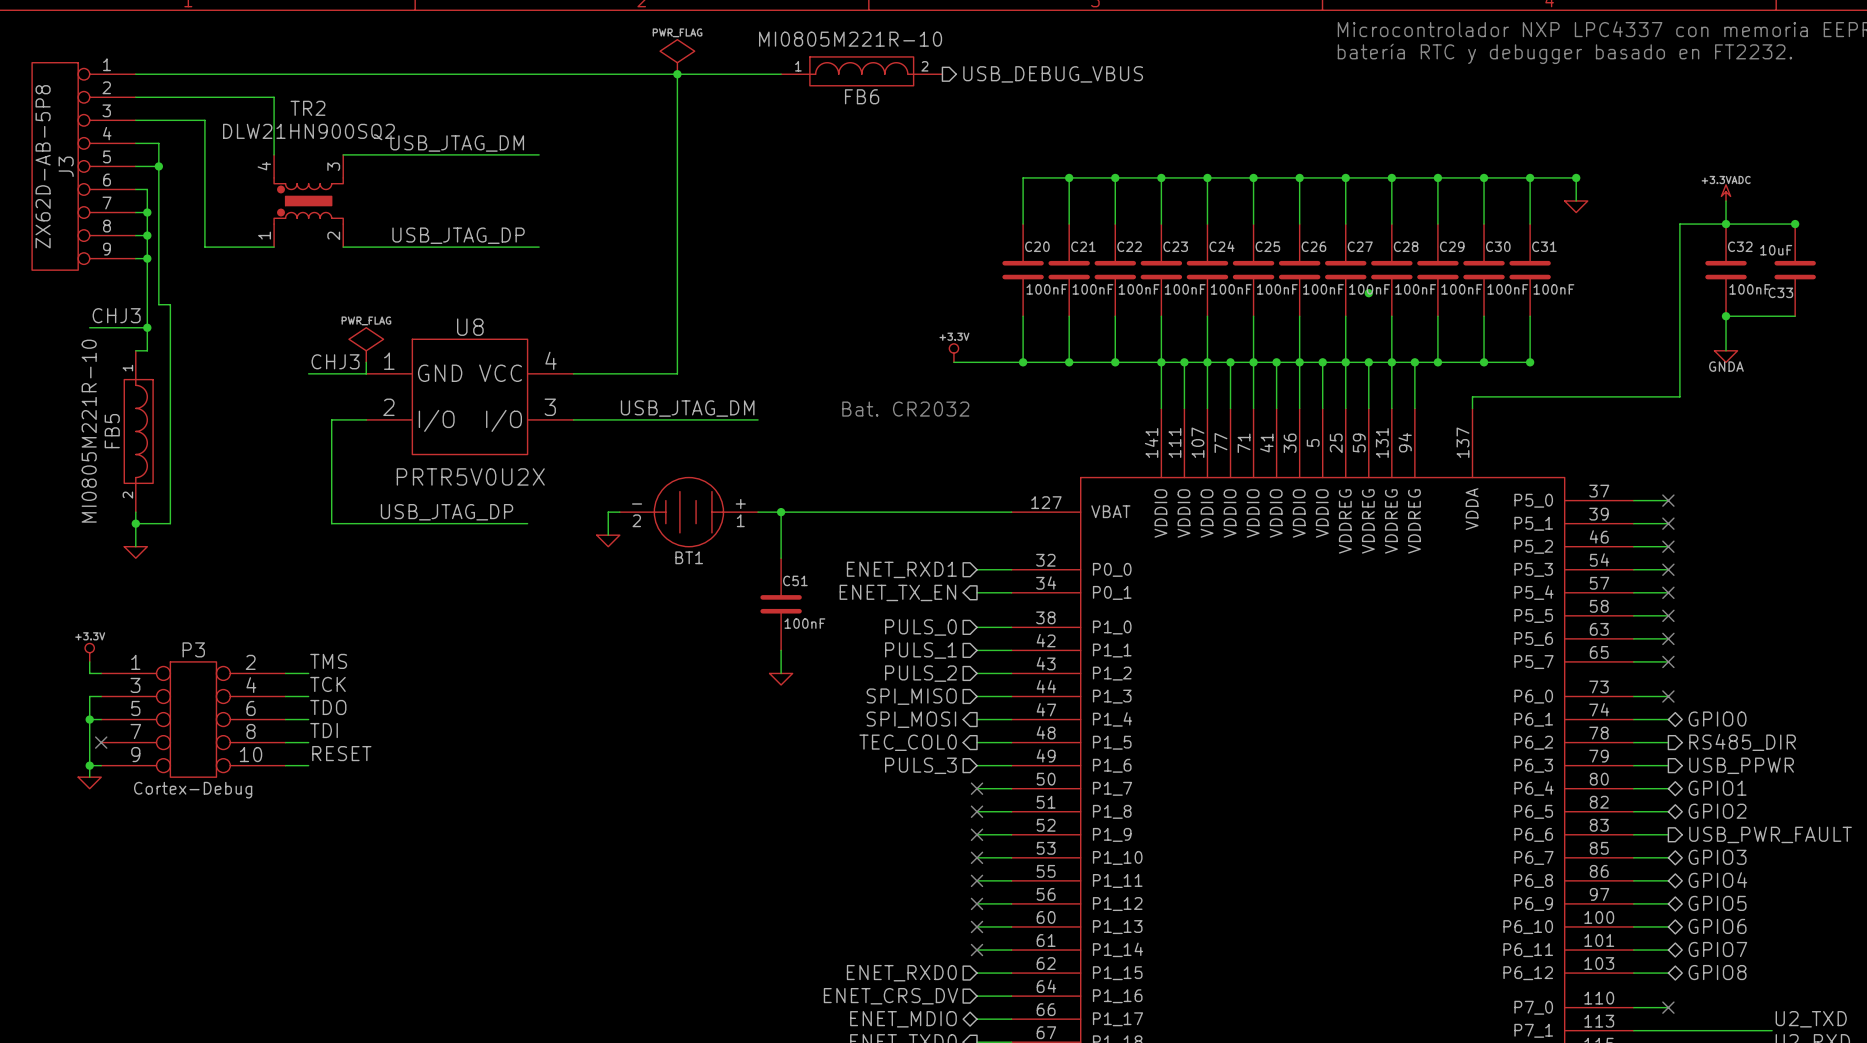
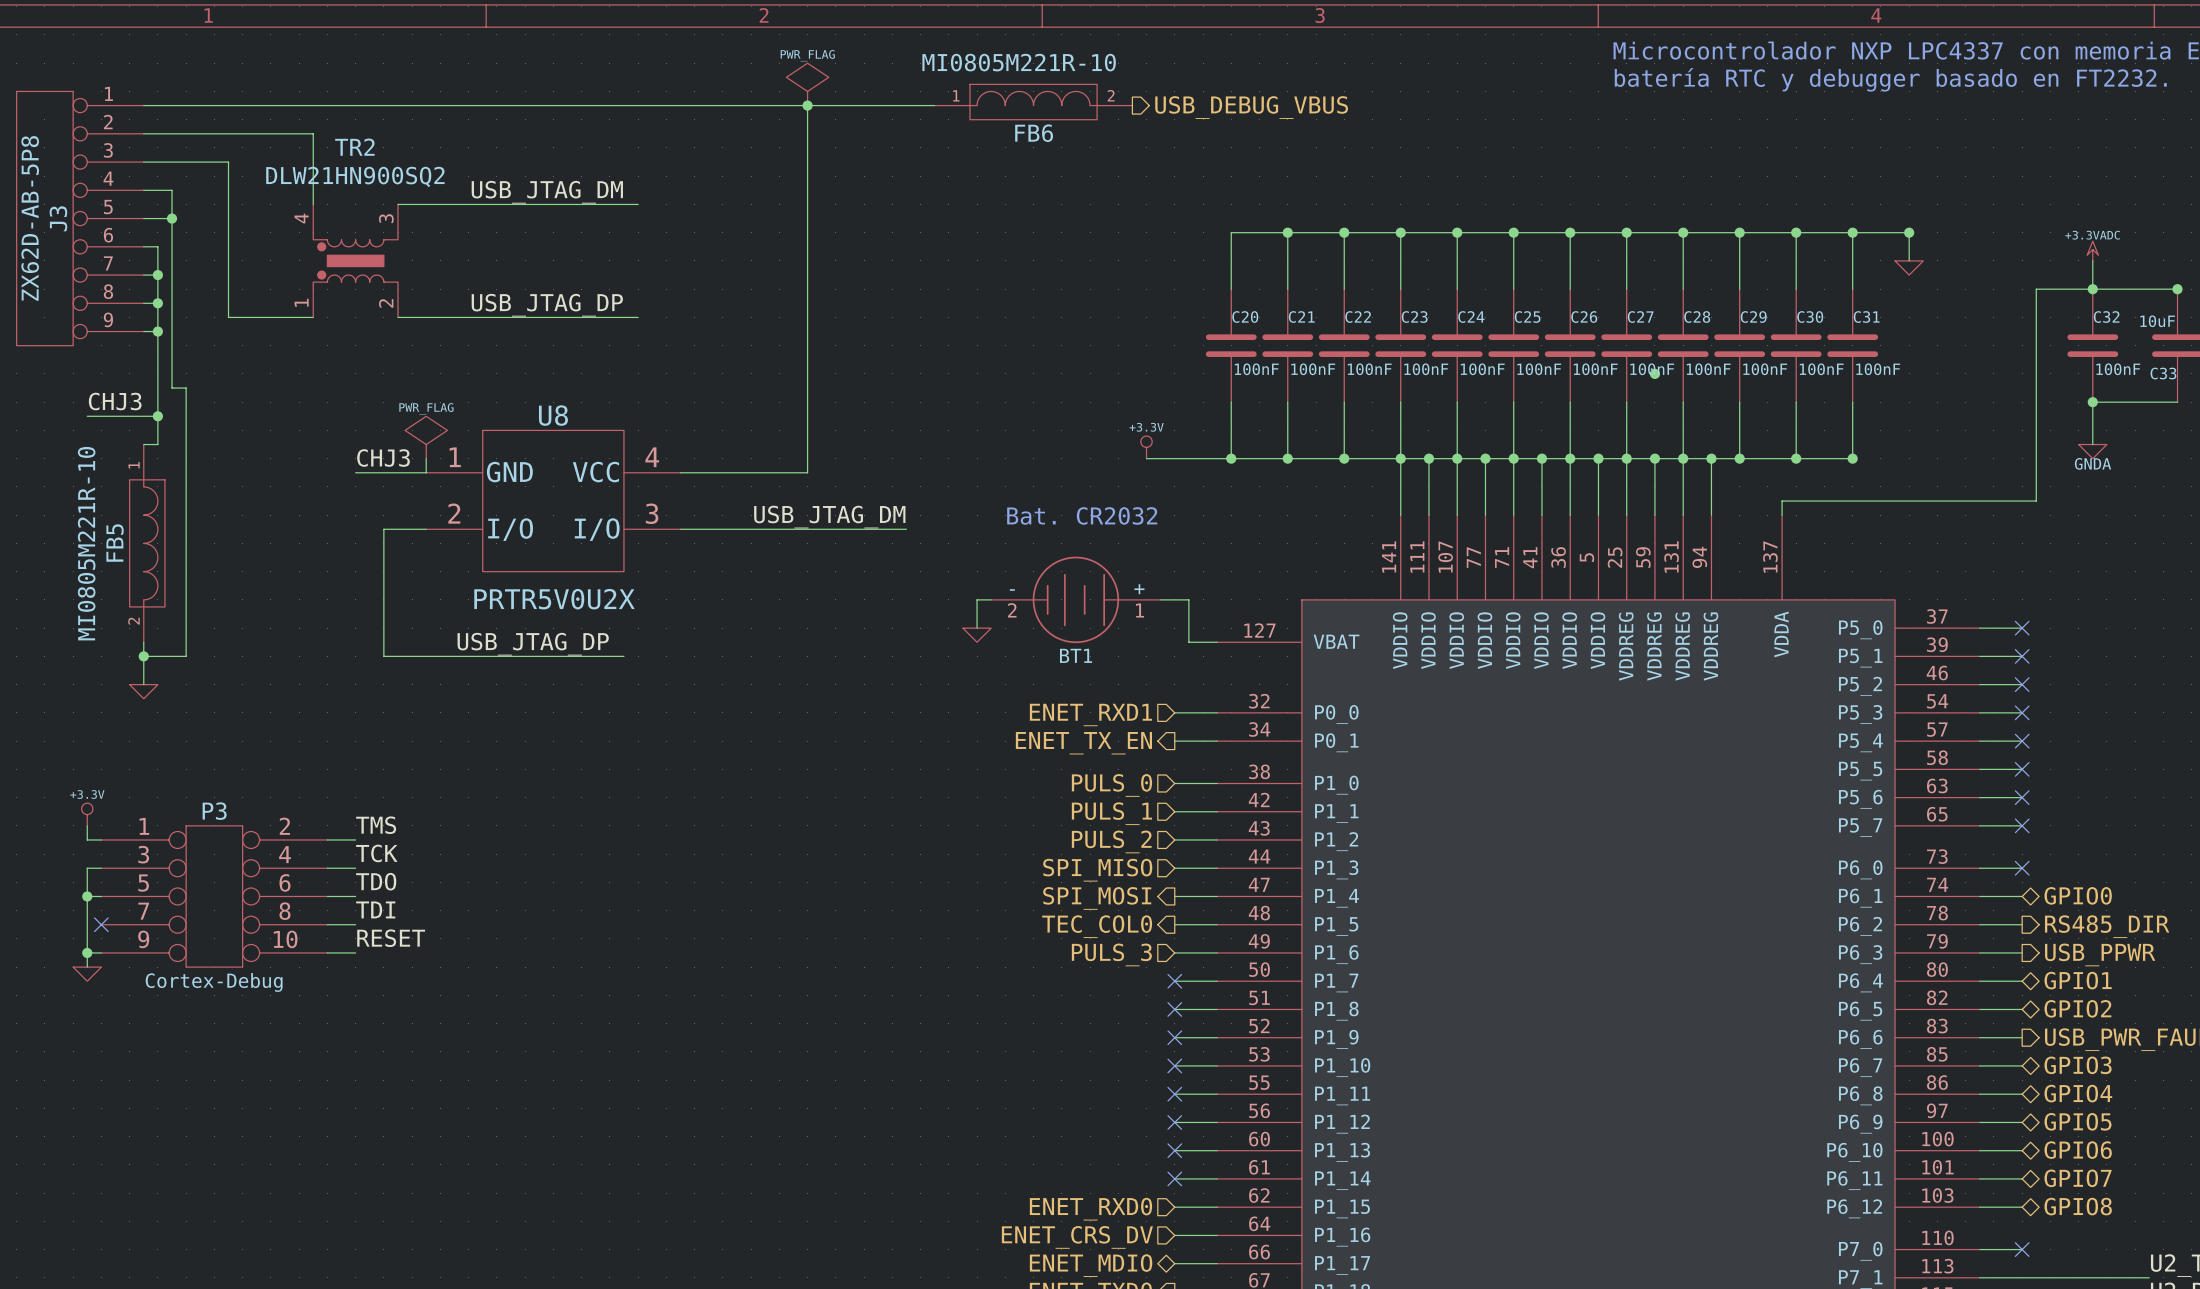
power symbol: none -> (977, 635)
wire: (619, 512) (608, 512) (608, 535) -> (991, 599) (977, 599) (977, 628)
BT1 position: (688, 512) -> (1075, 599)
wire: (758, 512) (988, 512) -> (1160, 599) (1188, 599) (1188, 642)
wire: (781, 512) (781, 558) -> none
junction: (781, 512) -> none
power symbol: (608, 540) -> none
C51: 100nF (781, 604) -> none
wire: (781, 650) (781, 673) -> none
power symbol: (781, 679) -> none

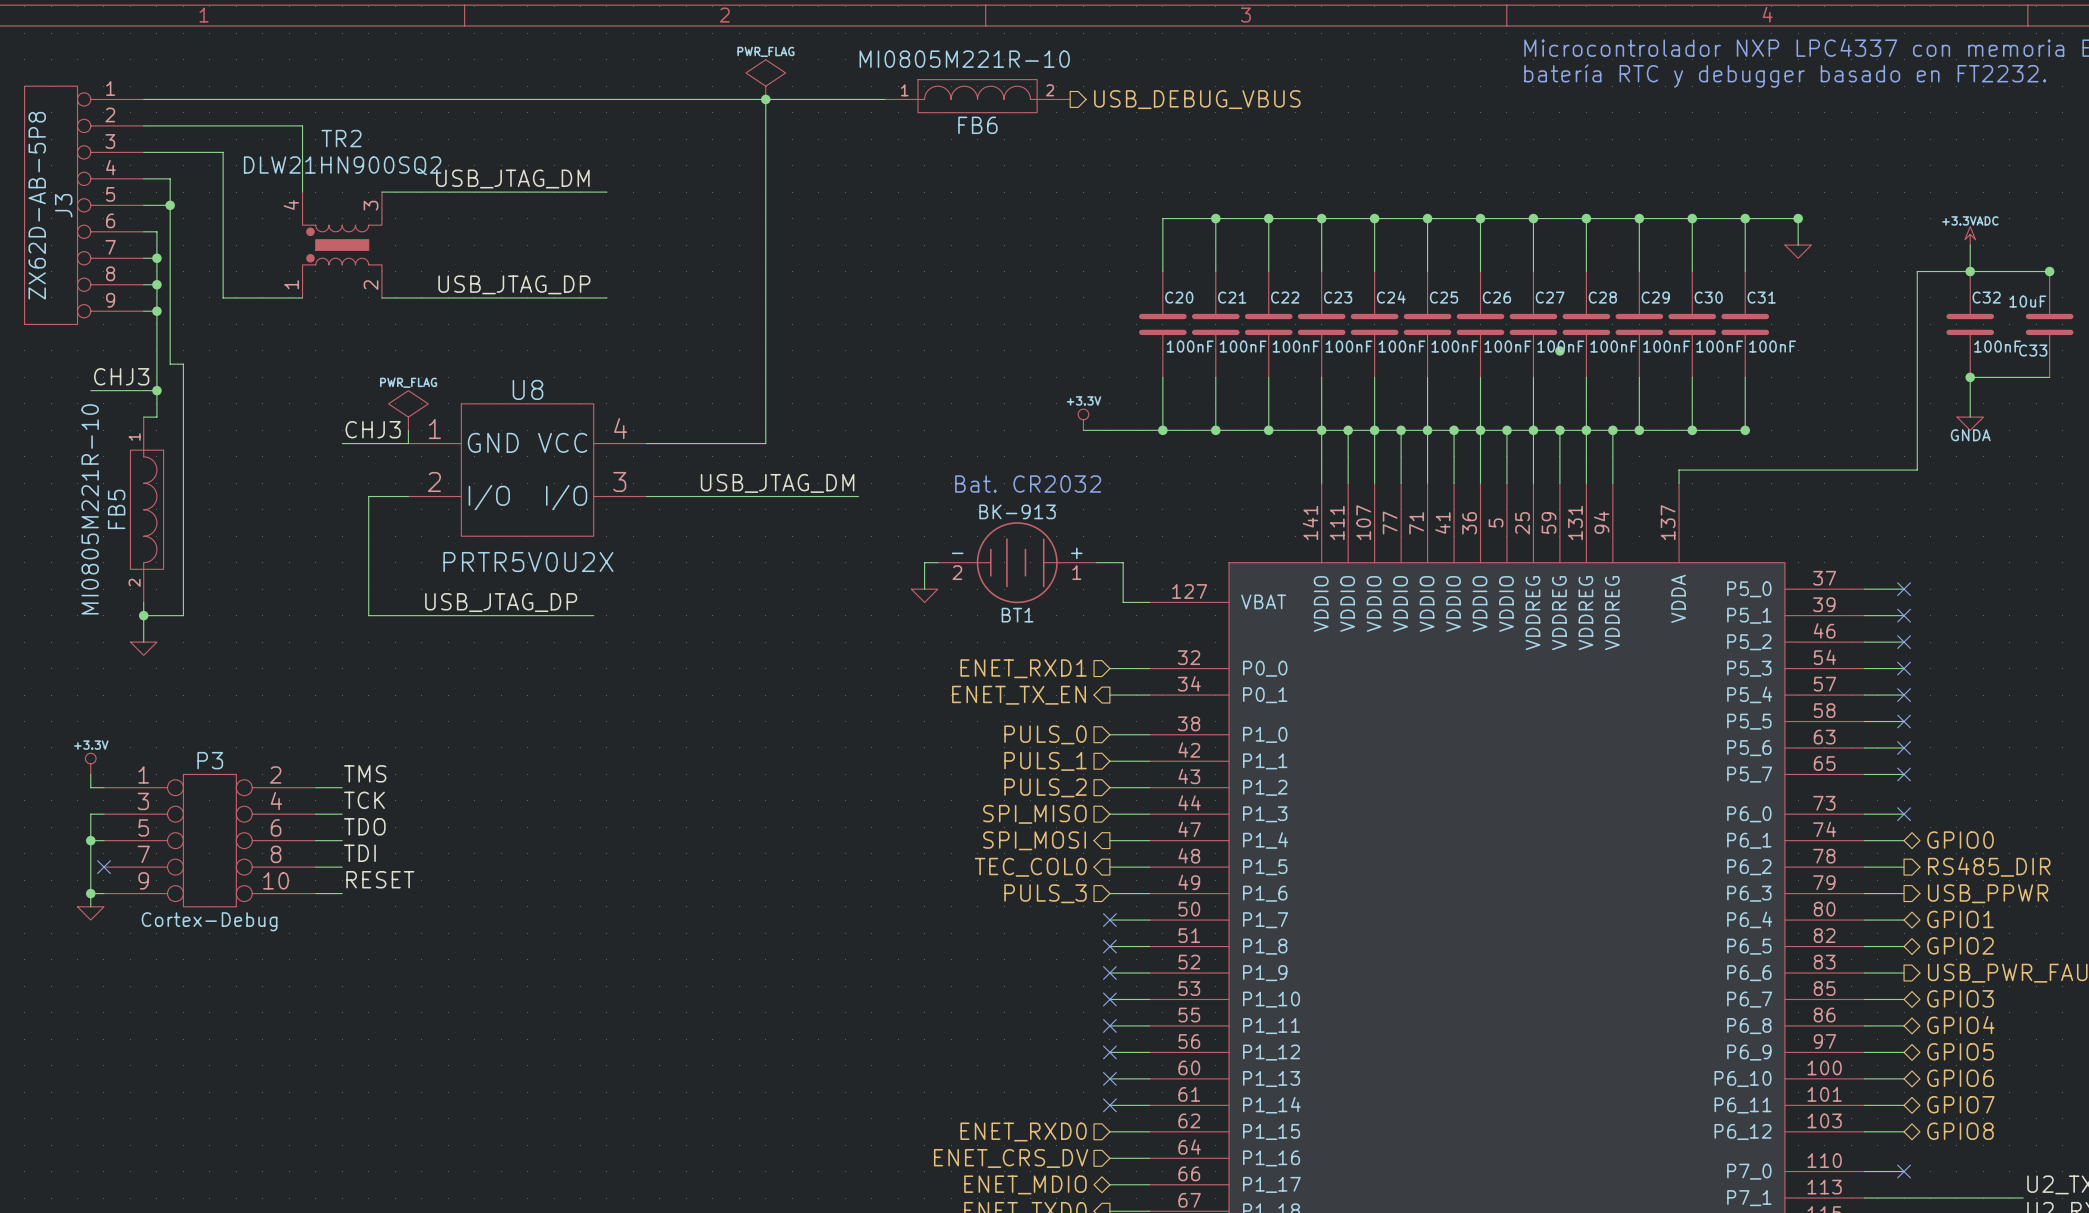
BT1 value: none -> BK-913 (1017, 511)

